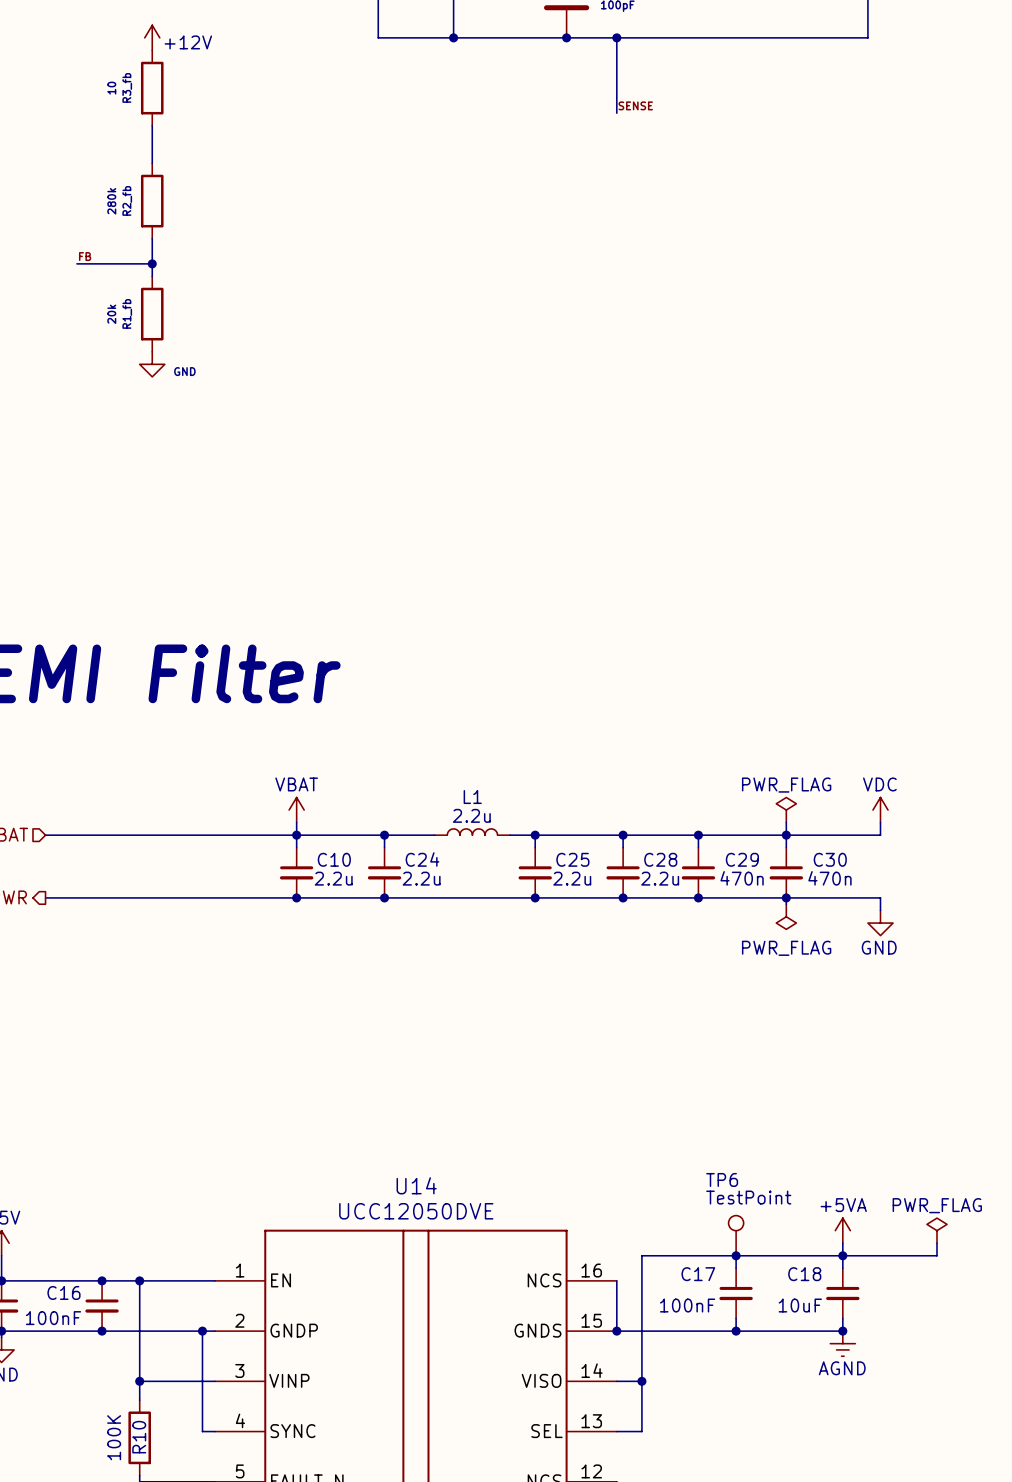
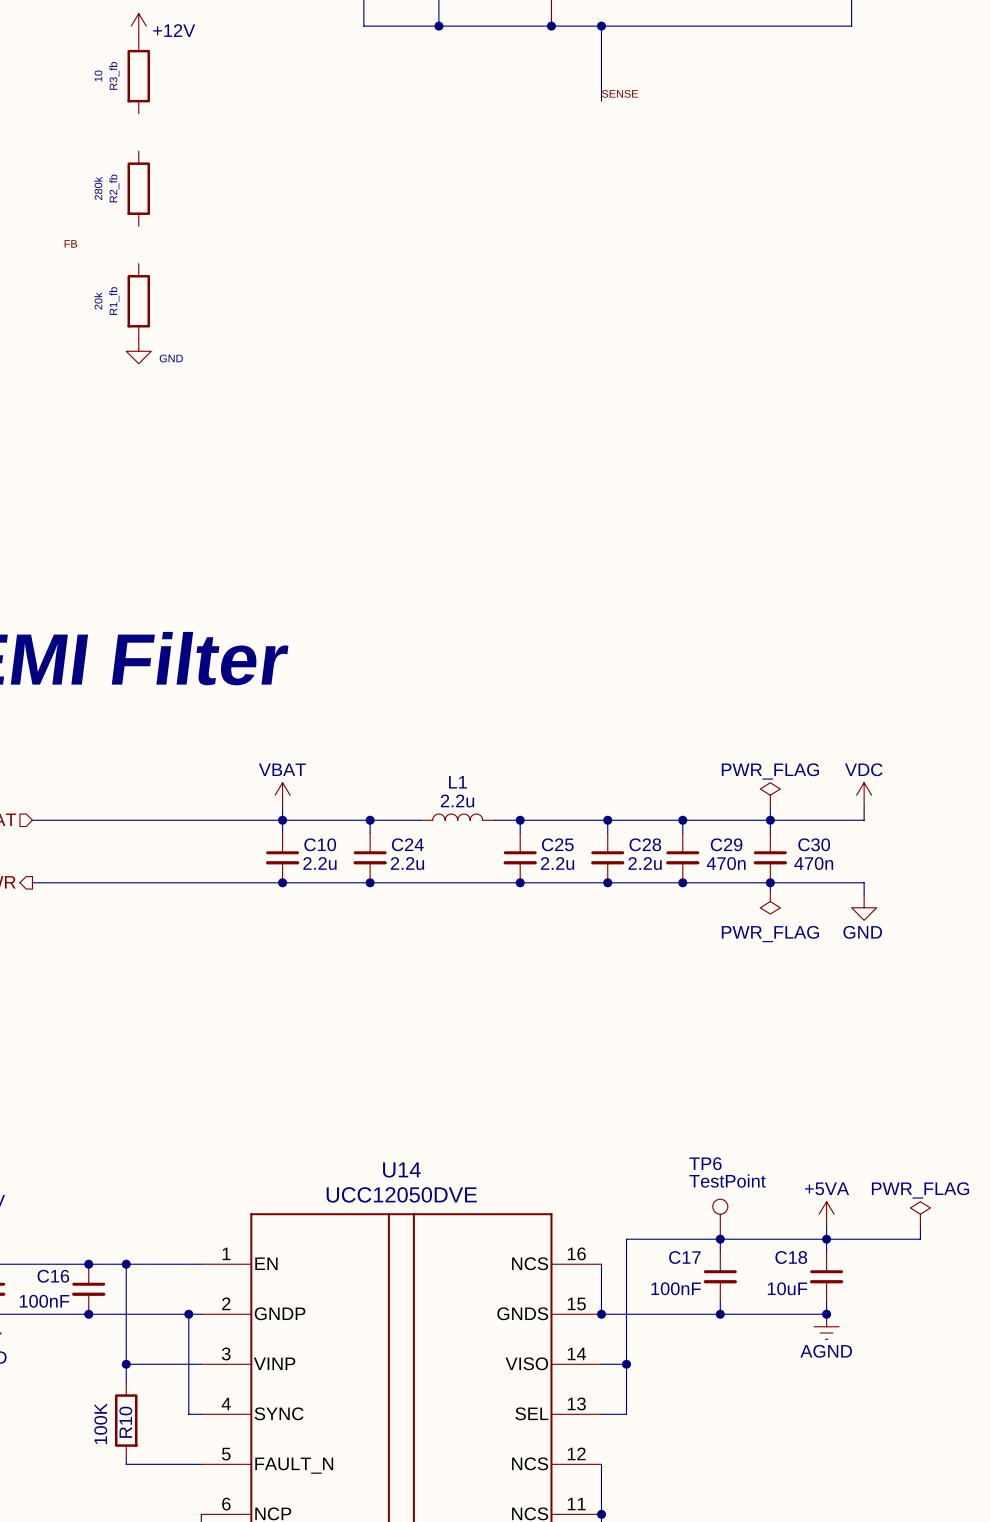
wire: (152, 125) (152, 163) -> none
wire: (152, 238) (152, 276) -> none
wire: (76, 263) (152, 263) -> none
junction: (152, 263) -> none

